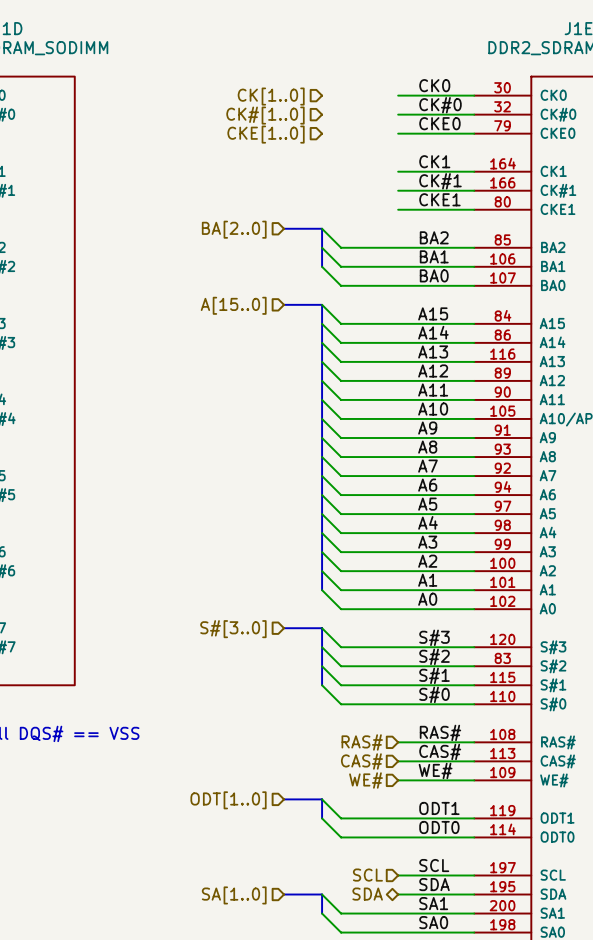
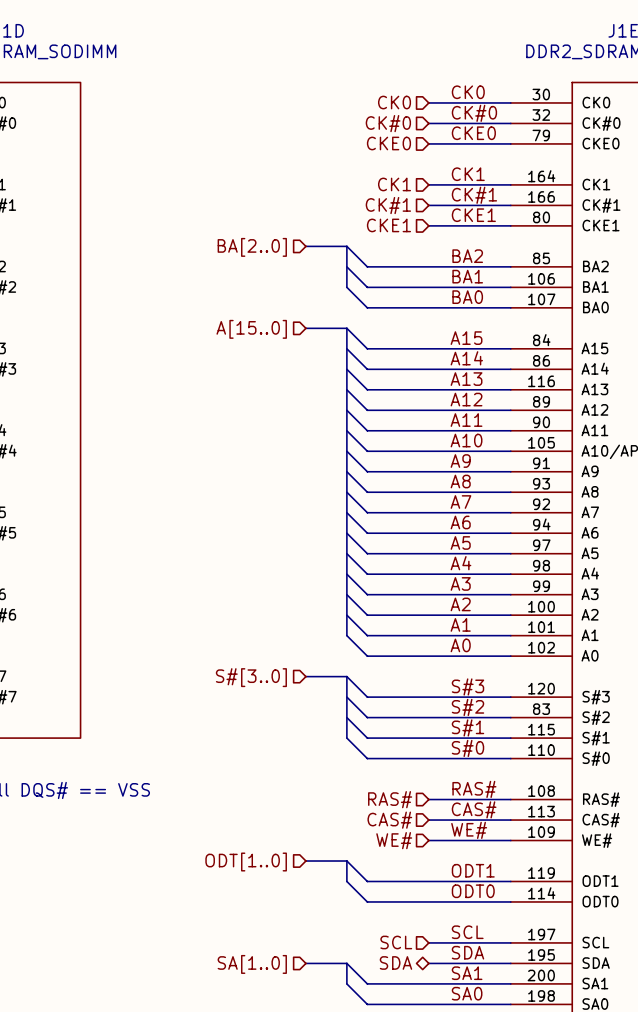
hierarchical label: none -> CK0 (394, 102)
hierarchical label: CK[1..0] (271, 96) -> none
hierarchical label: none -> CK#0 (388, 123)
hierarchical label: CK#[1..0] (265, 115) -> none
hierarchical label: none -> CKE0 (388, 143)
hierarchical label: CKE[1..0] (266, 134) -> none
hierarchical label: none -> CK1 (394, 184)
hierarchical label: none -> CK#1 (388, 205)
hierarchical label: none -> CKE1 (388, 225)

